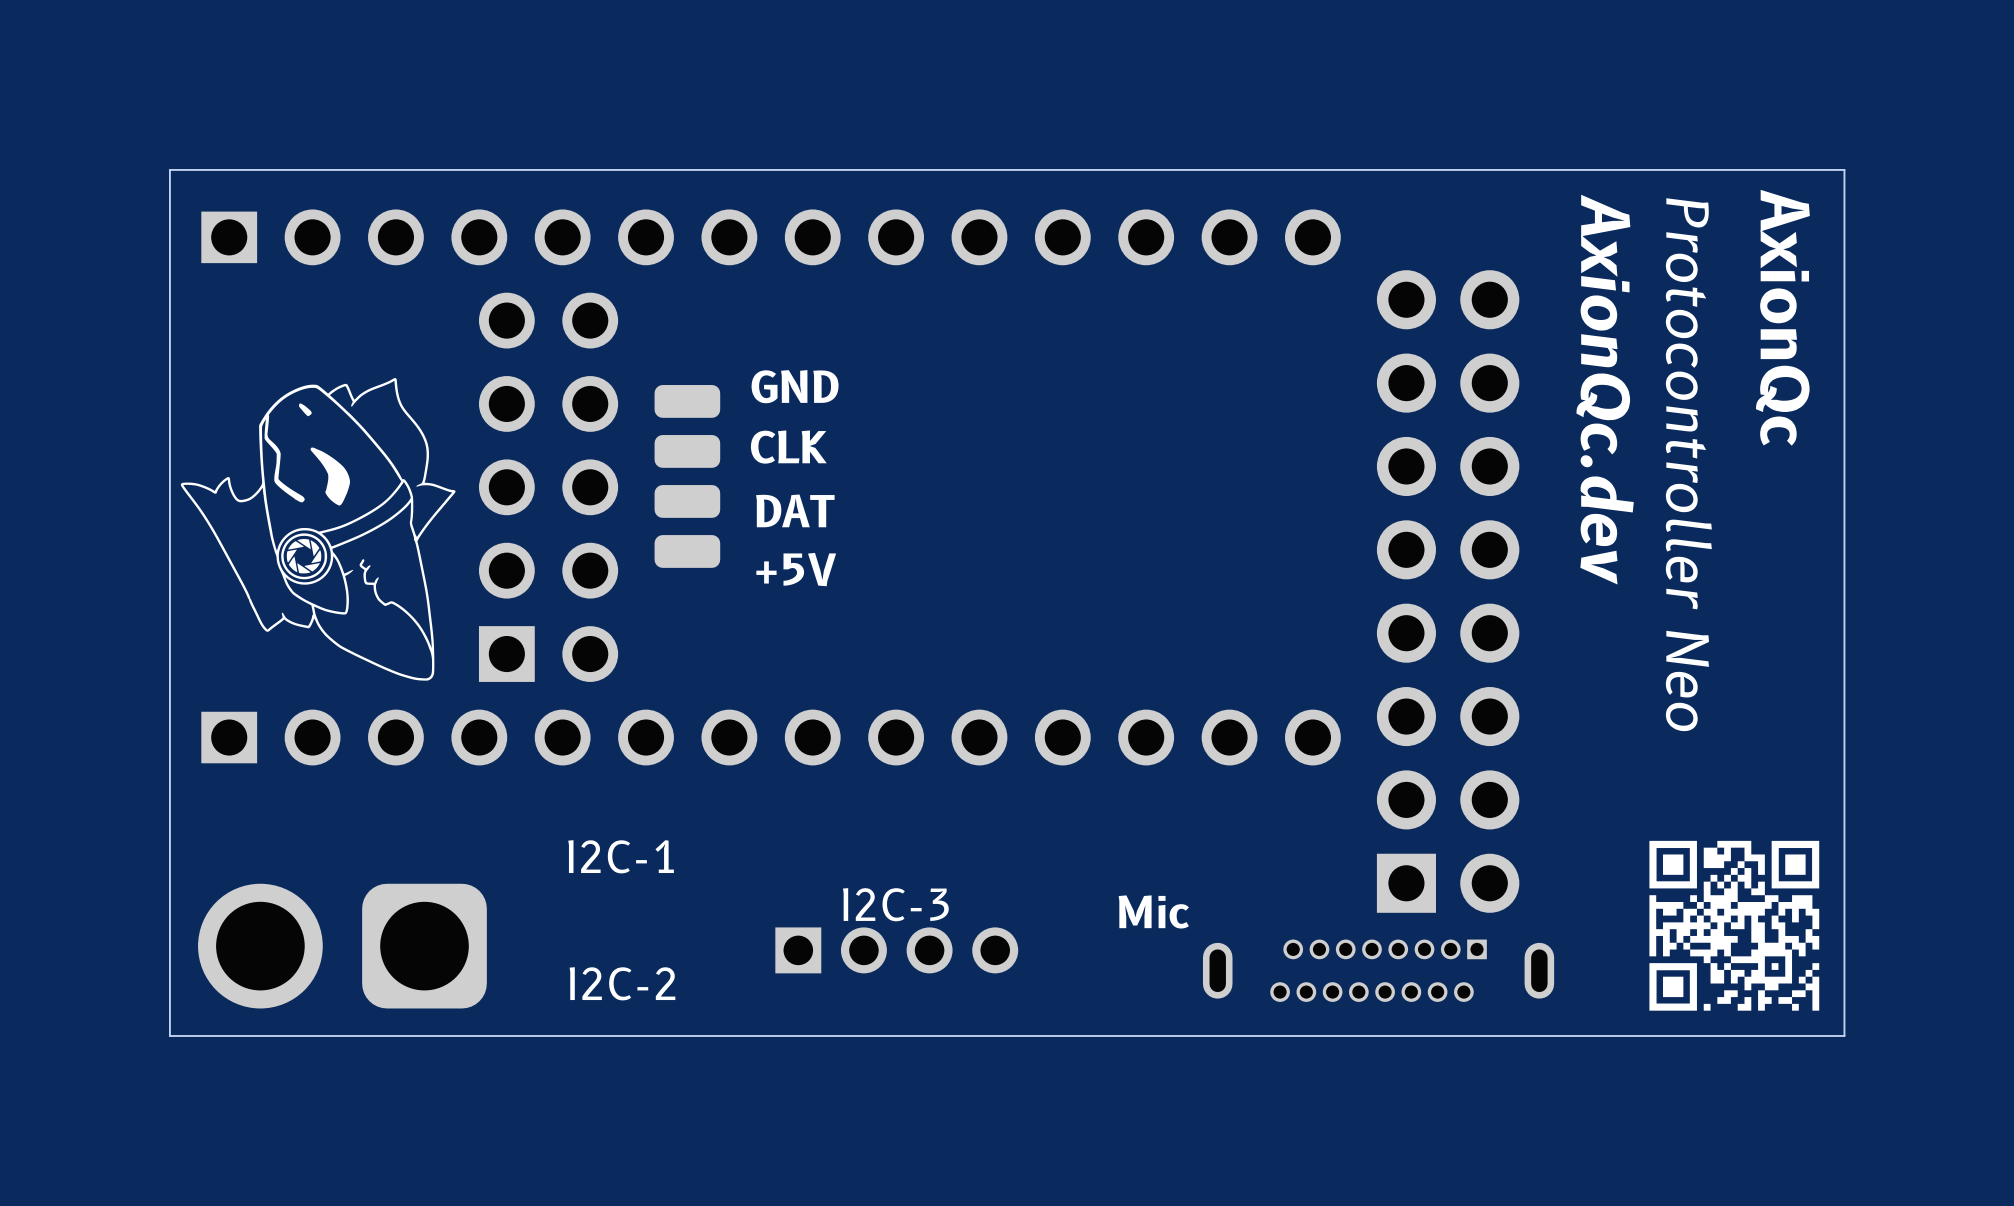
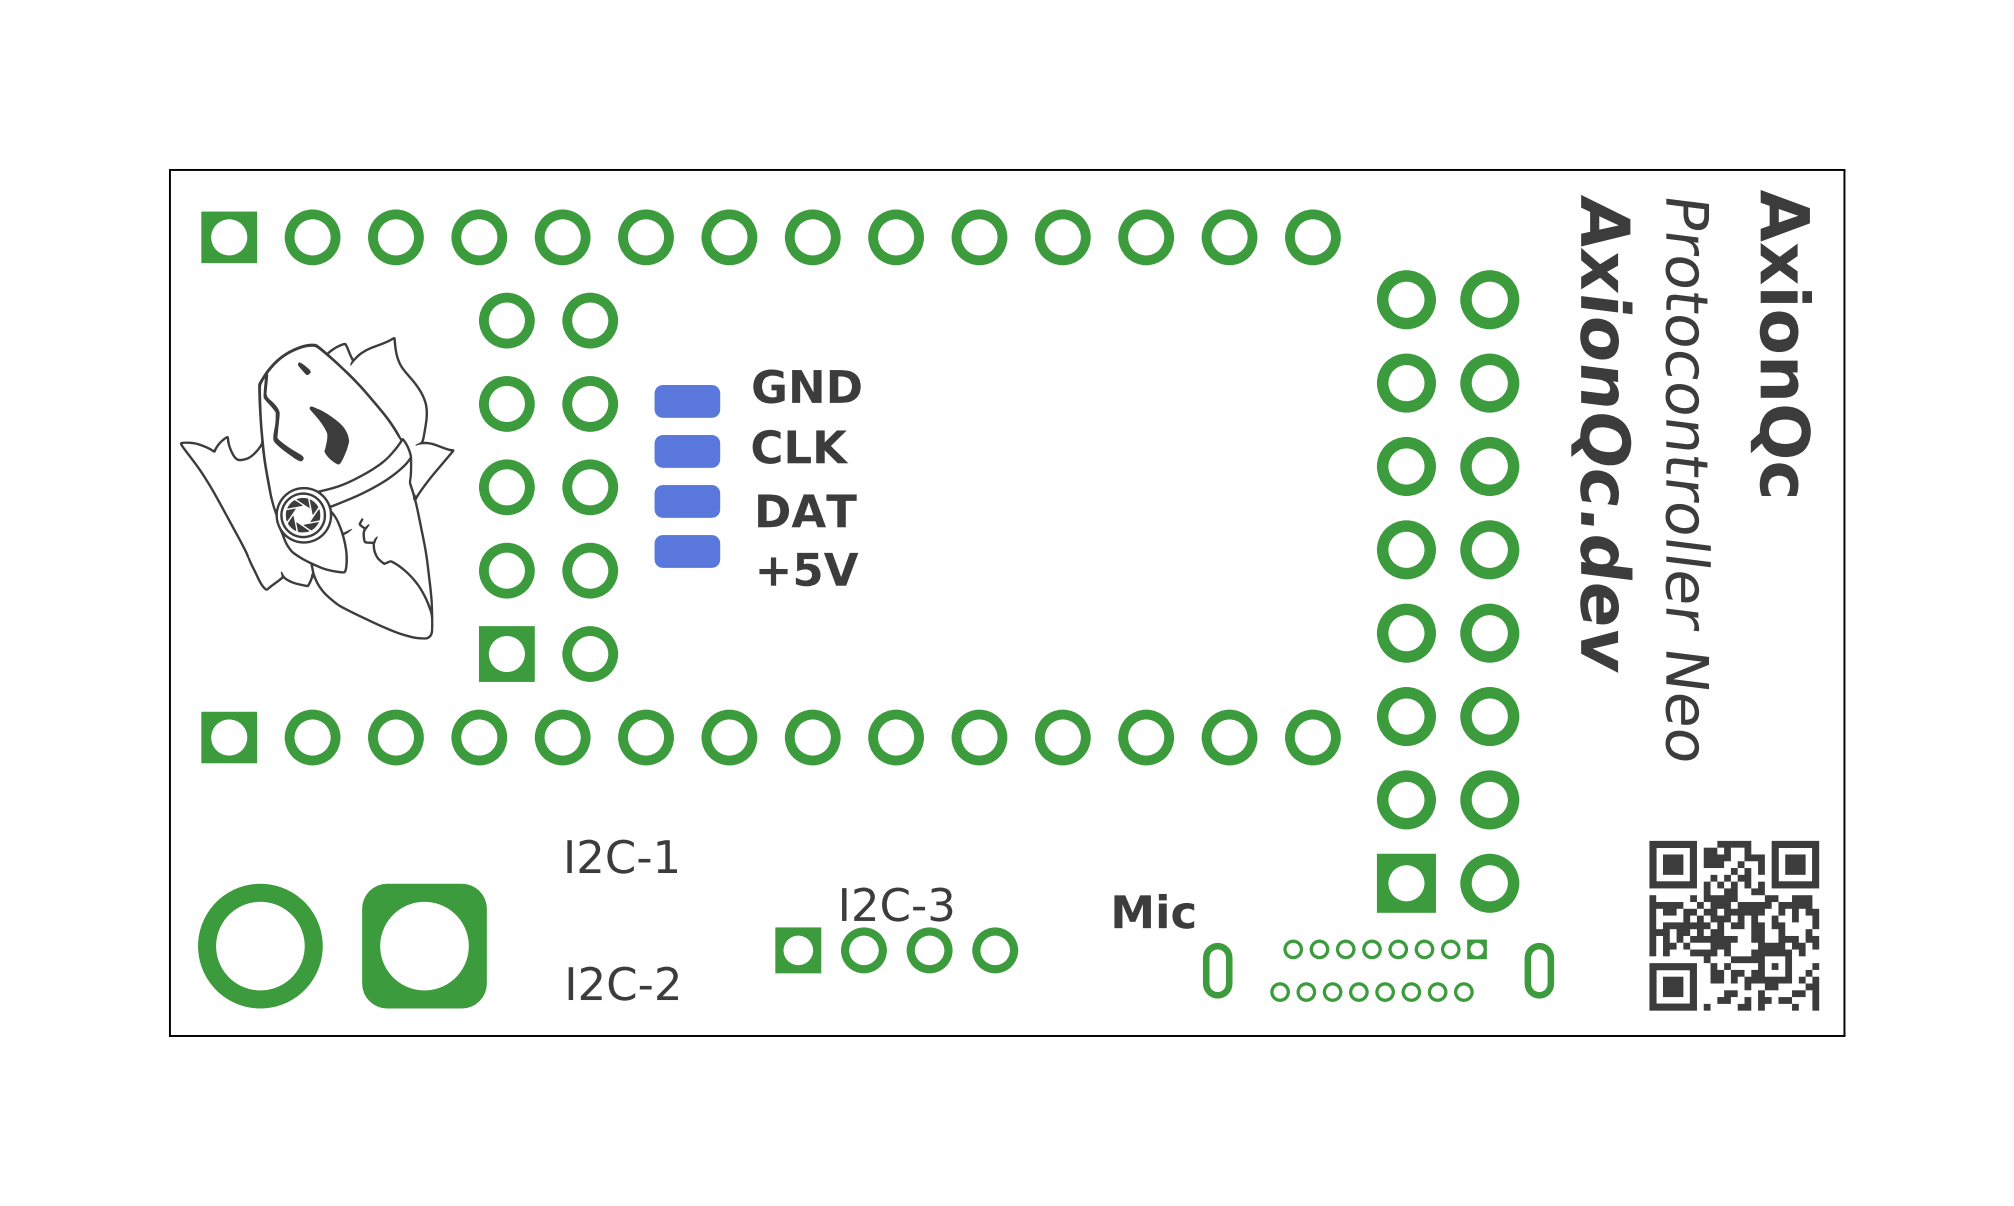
drawing position: (318, 529) -> (317, 488)

